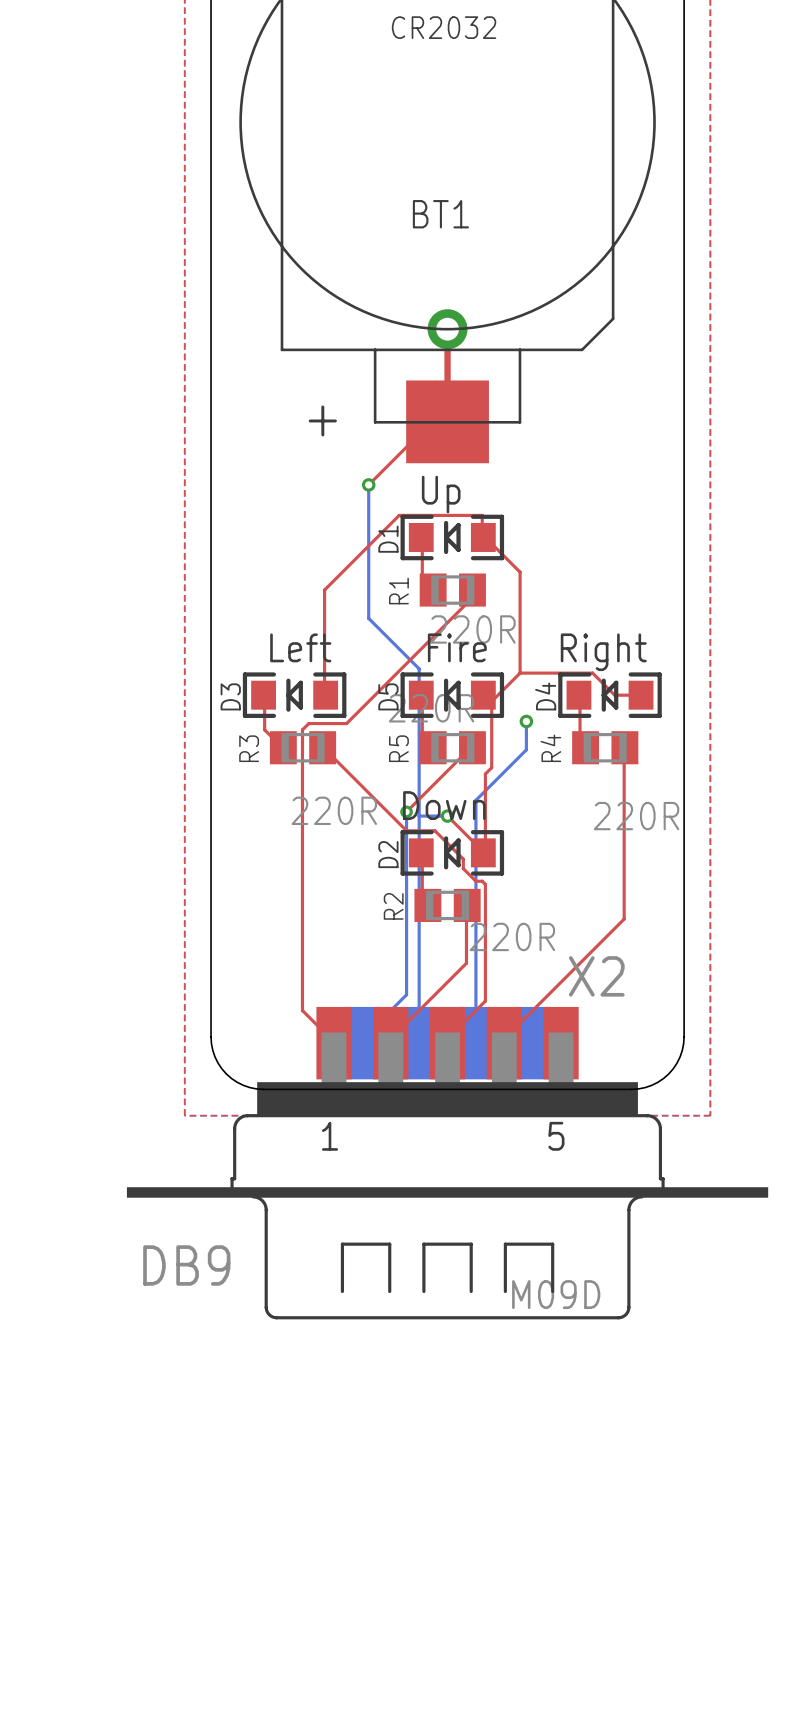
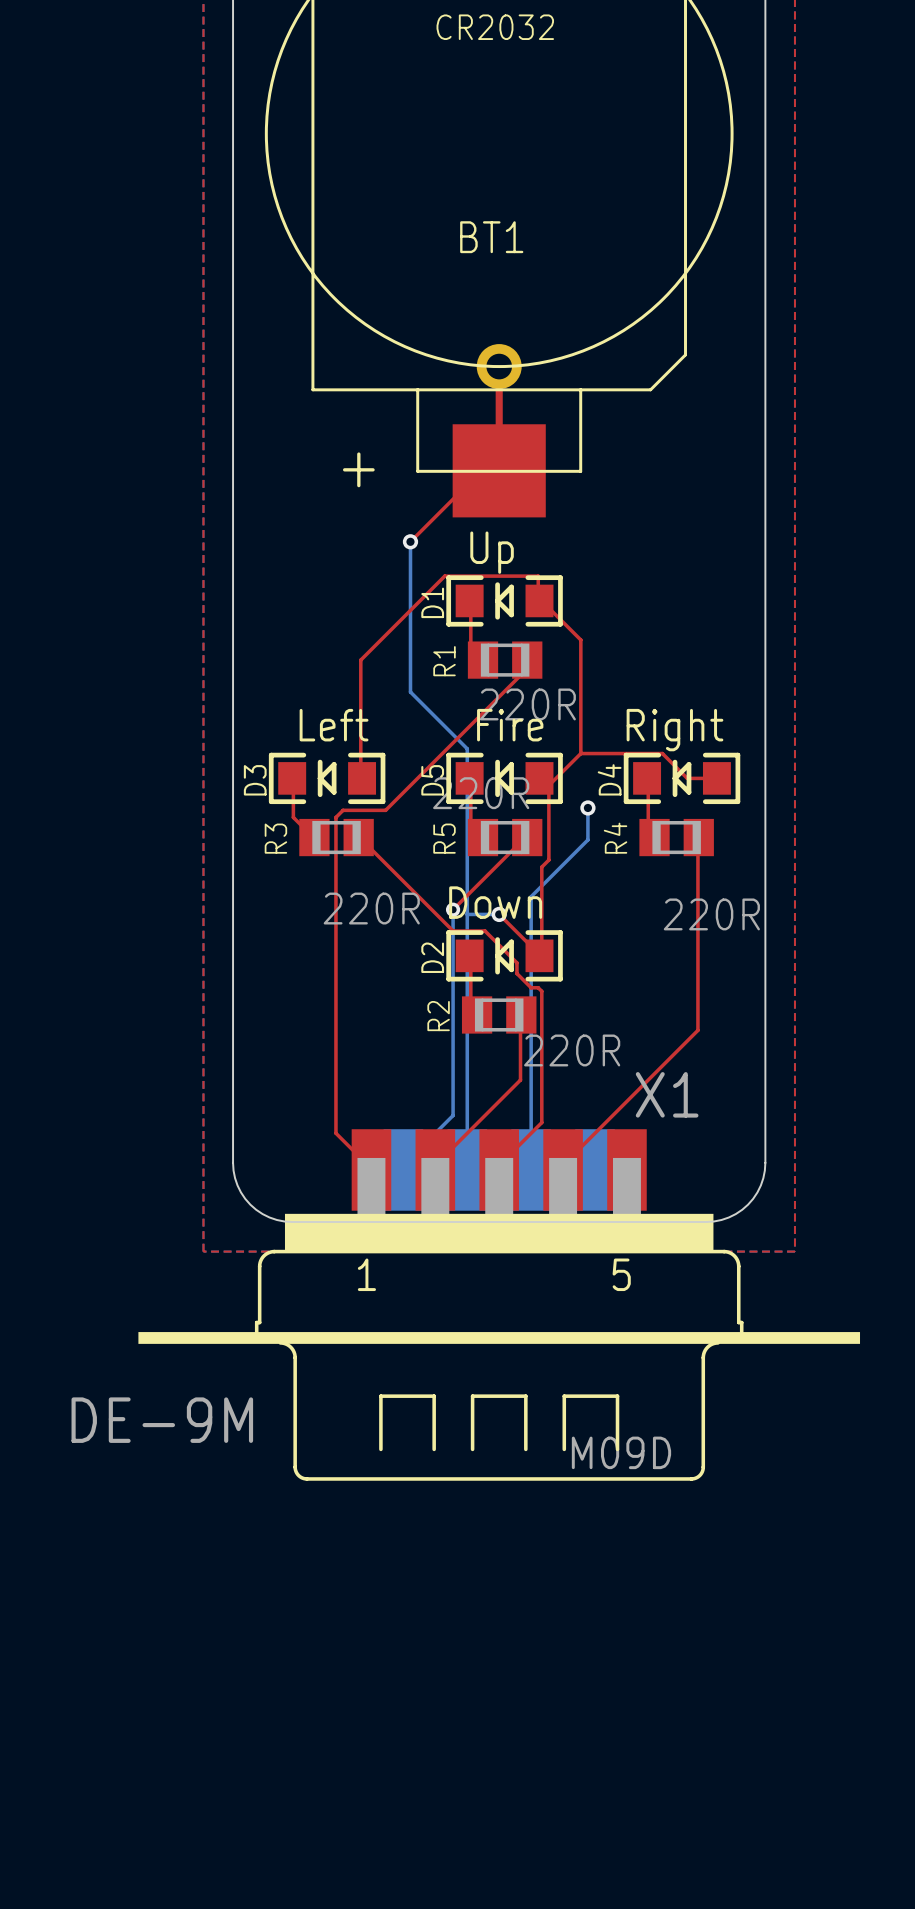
X2 name: X2 (596, 976) -> X1 (667, 1094)
X2 value: DB9 (186, 1265) -> DE-9M (162, 1420)

